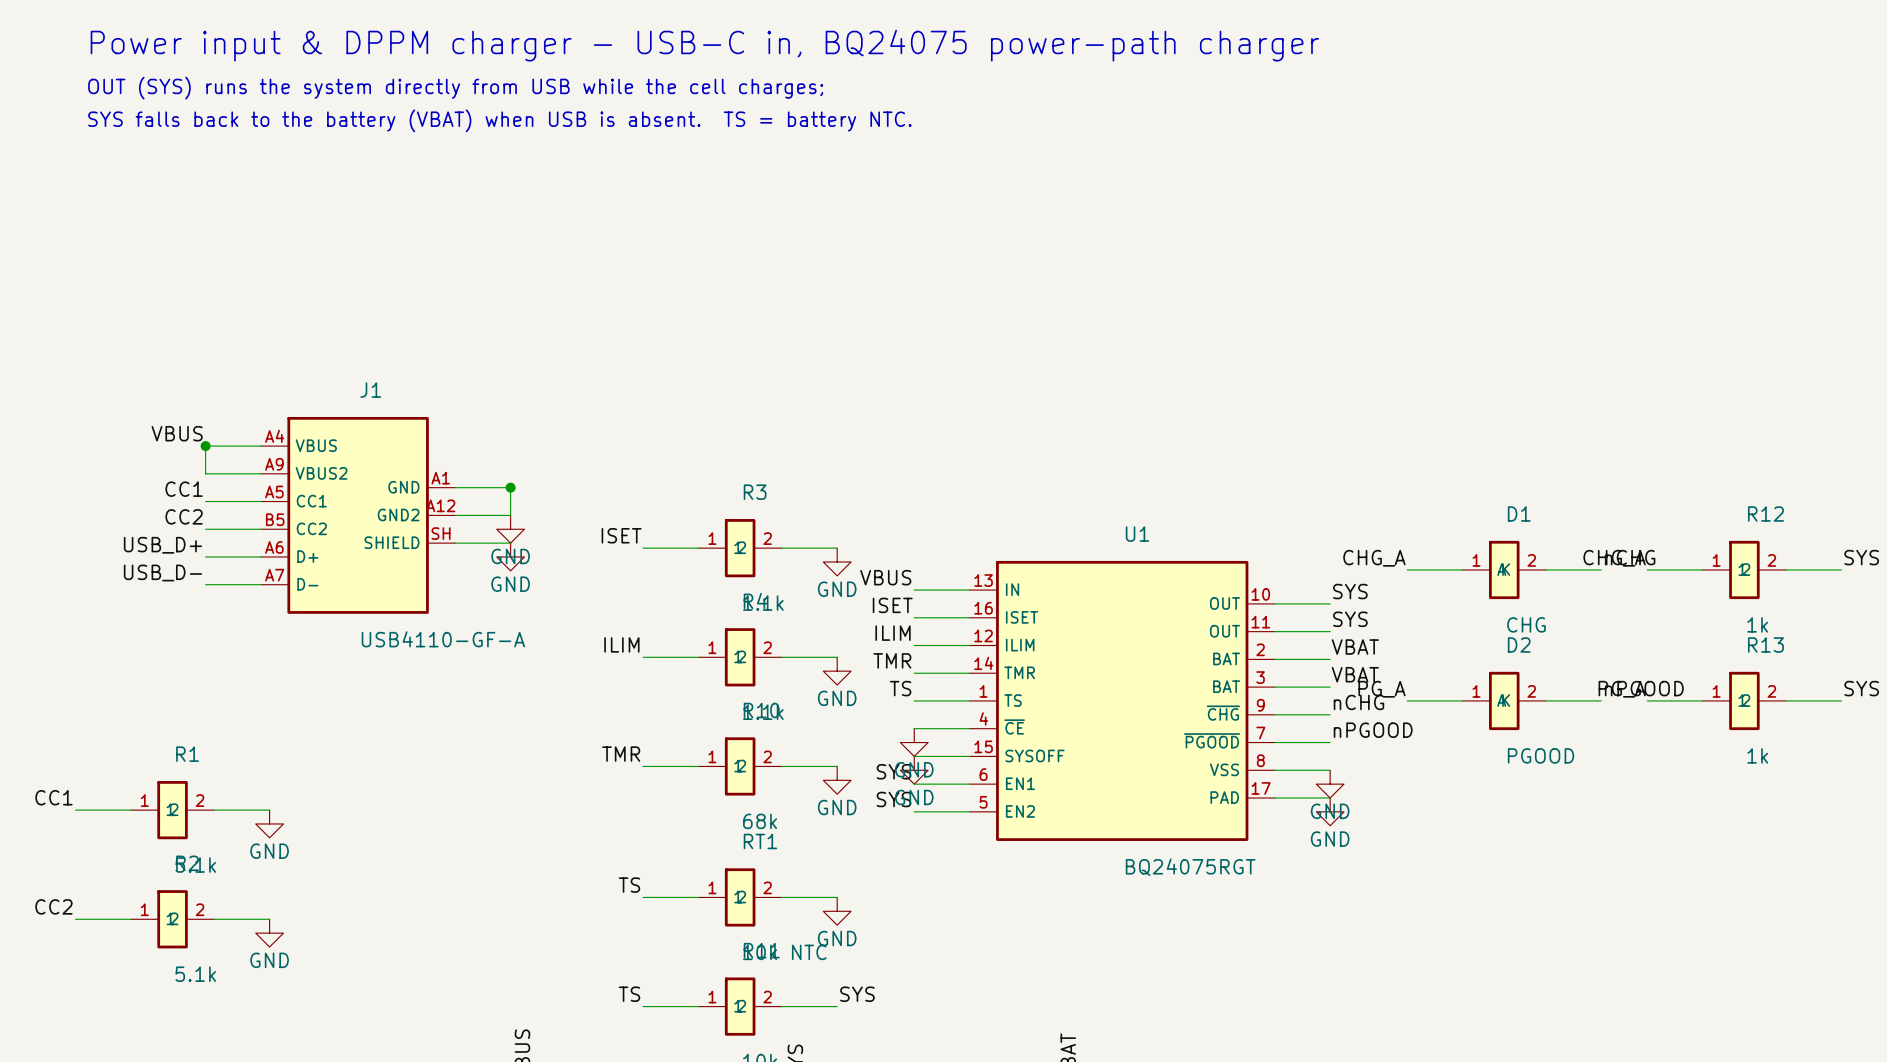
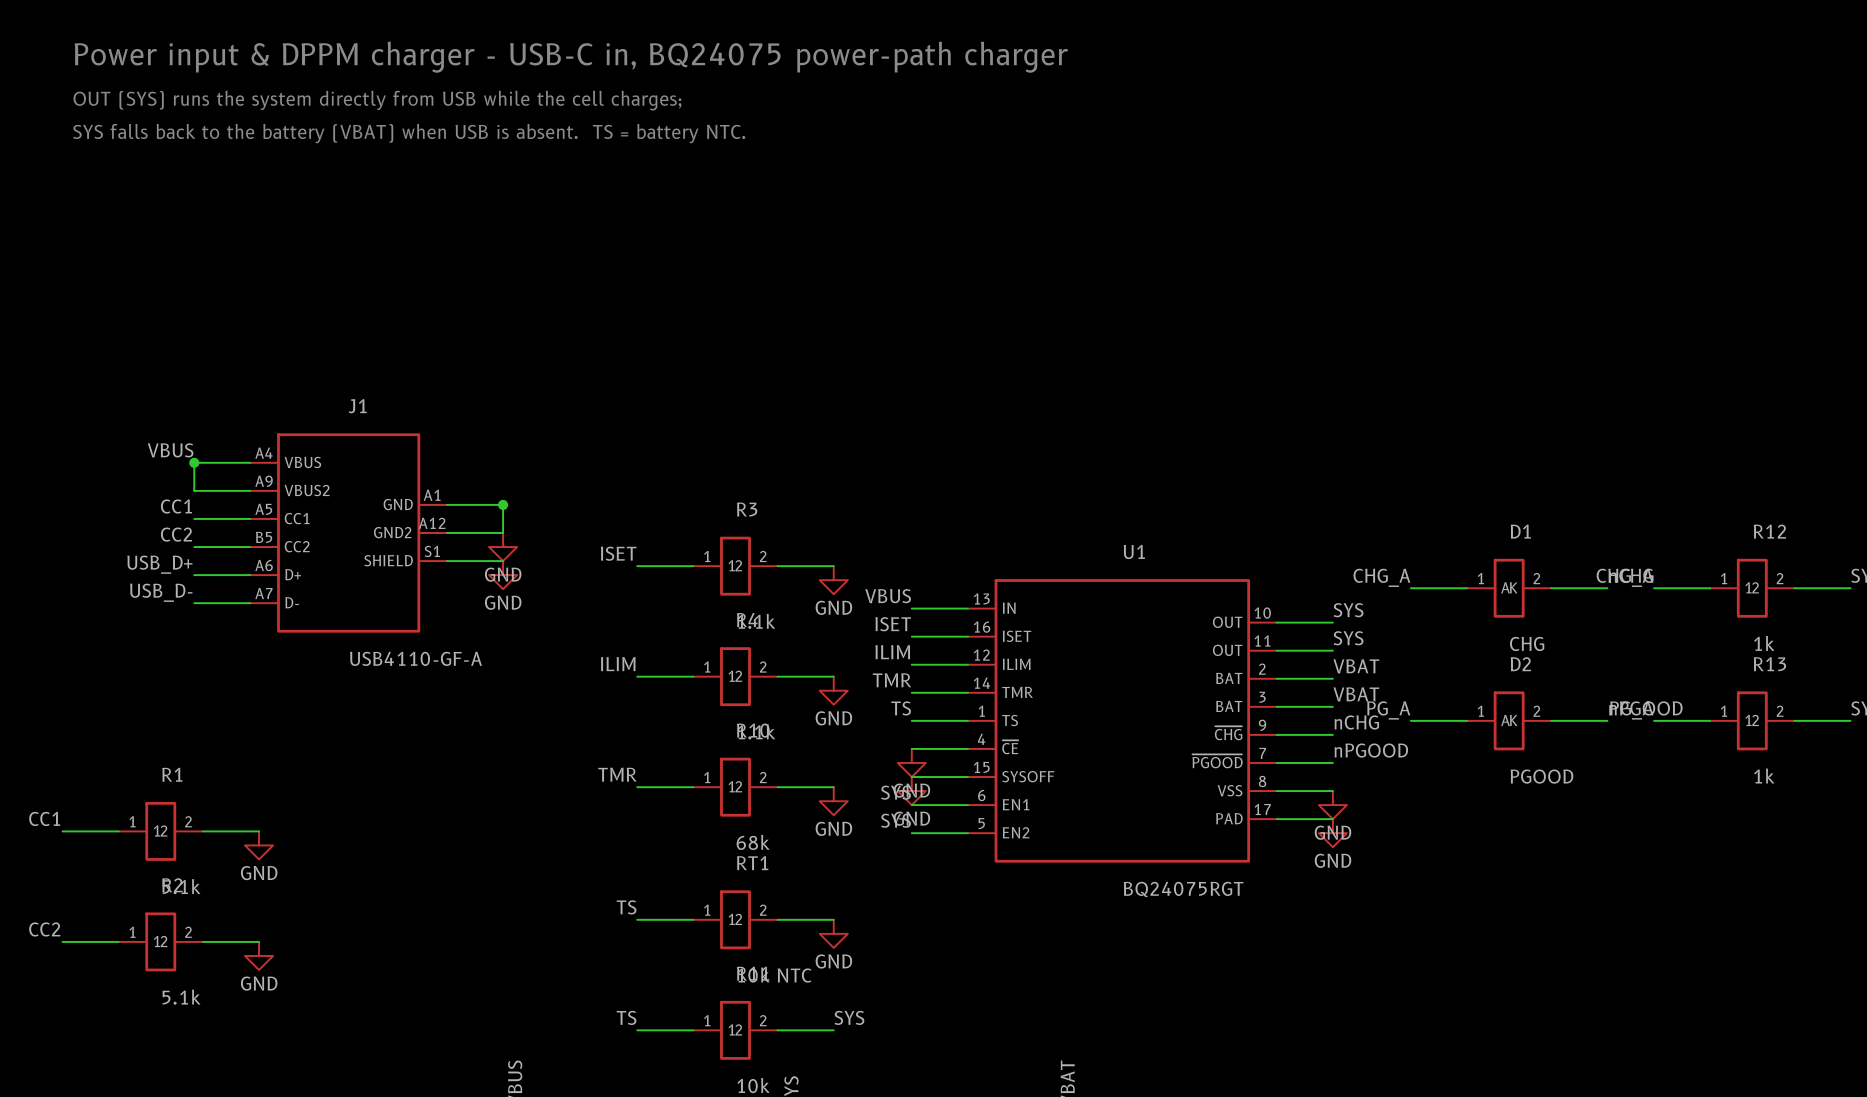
J1 pin number: SH (441, 533) -> S1 (432, 551)

